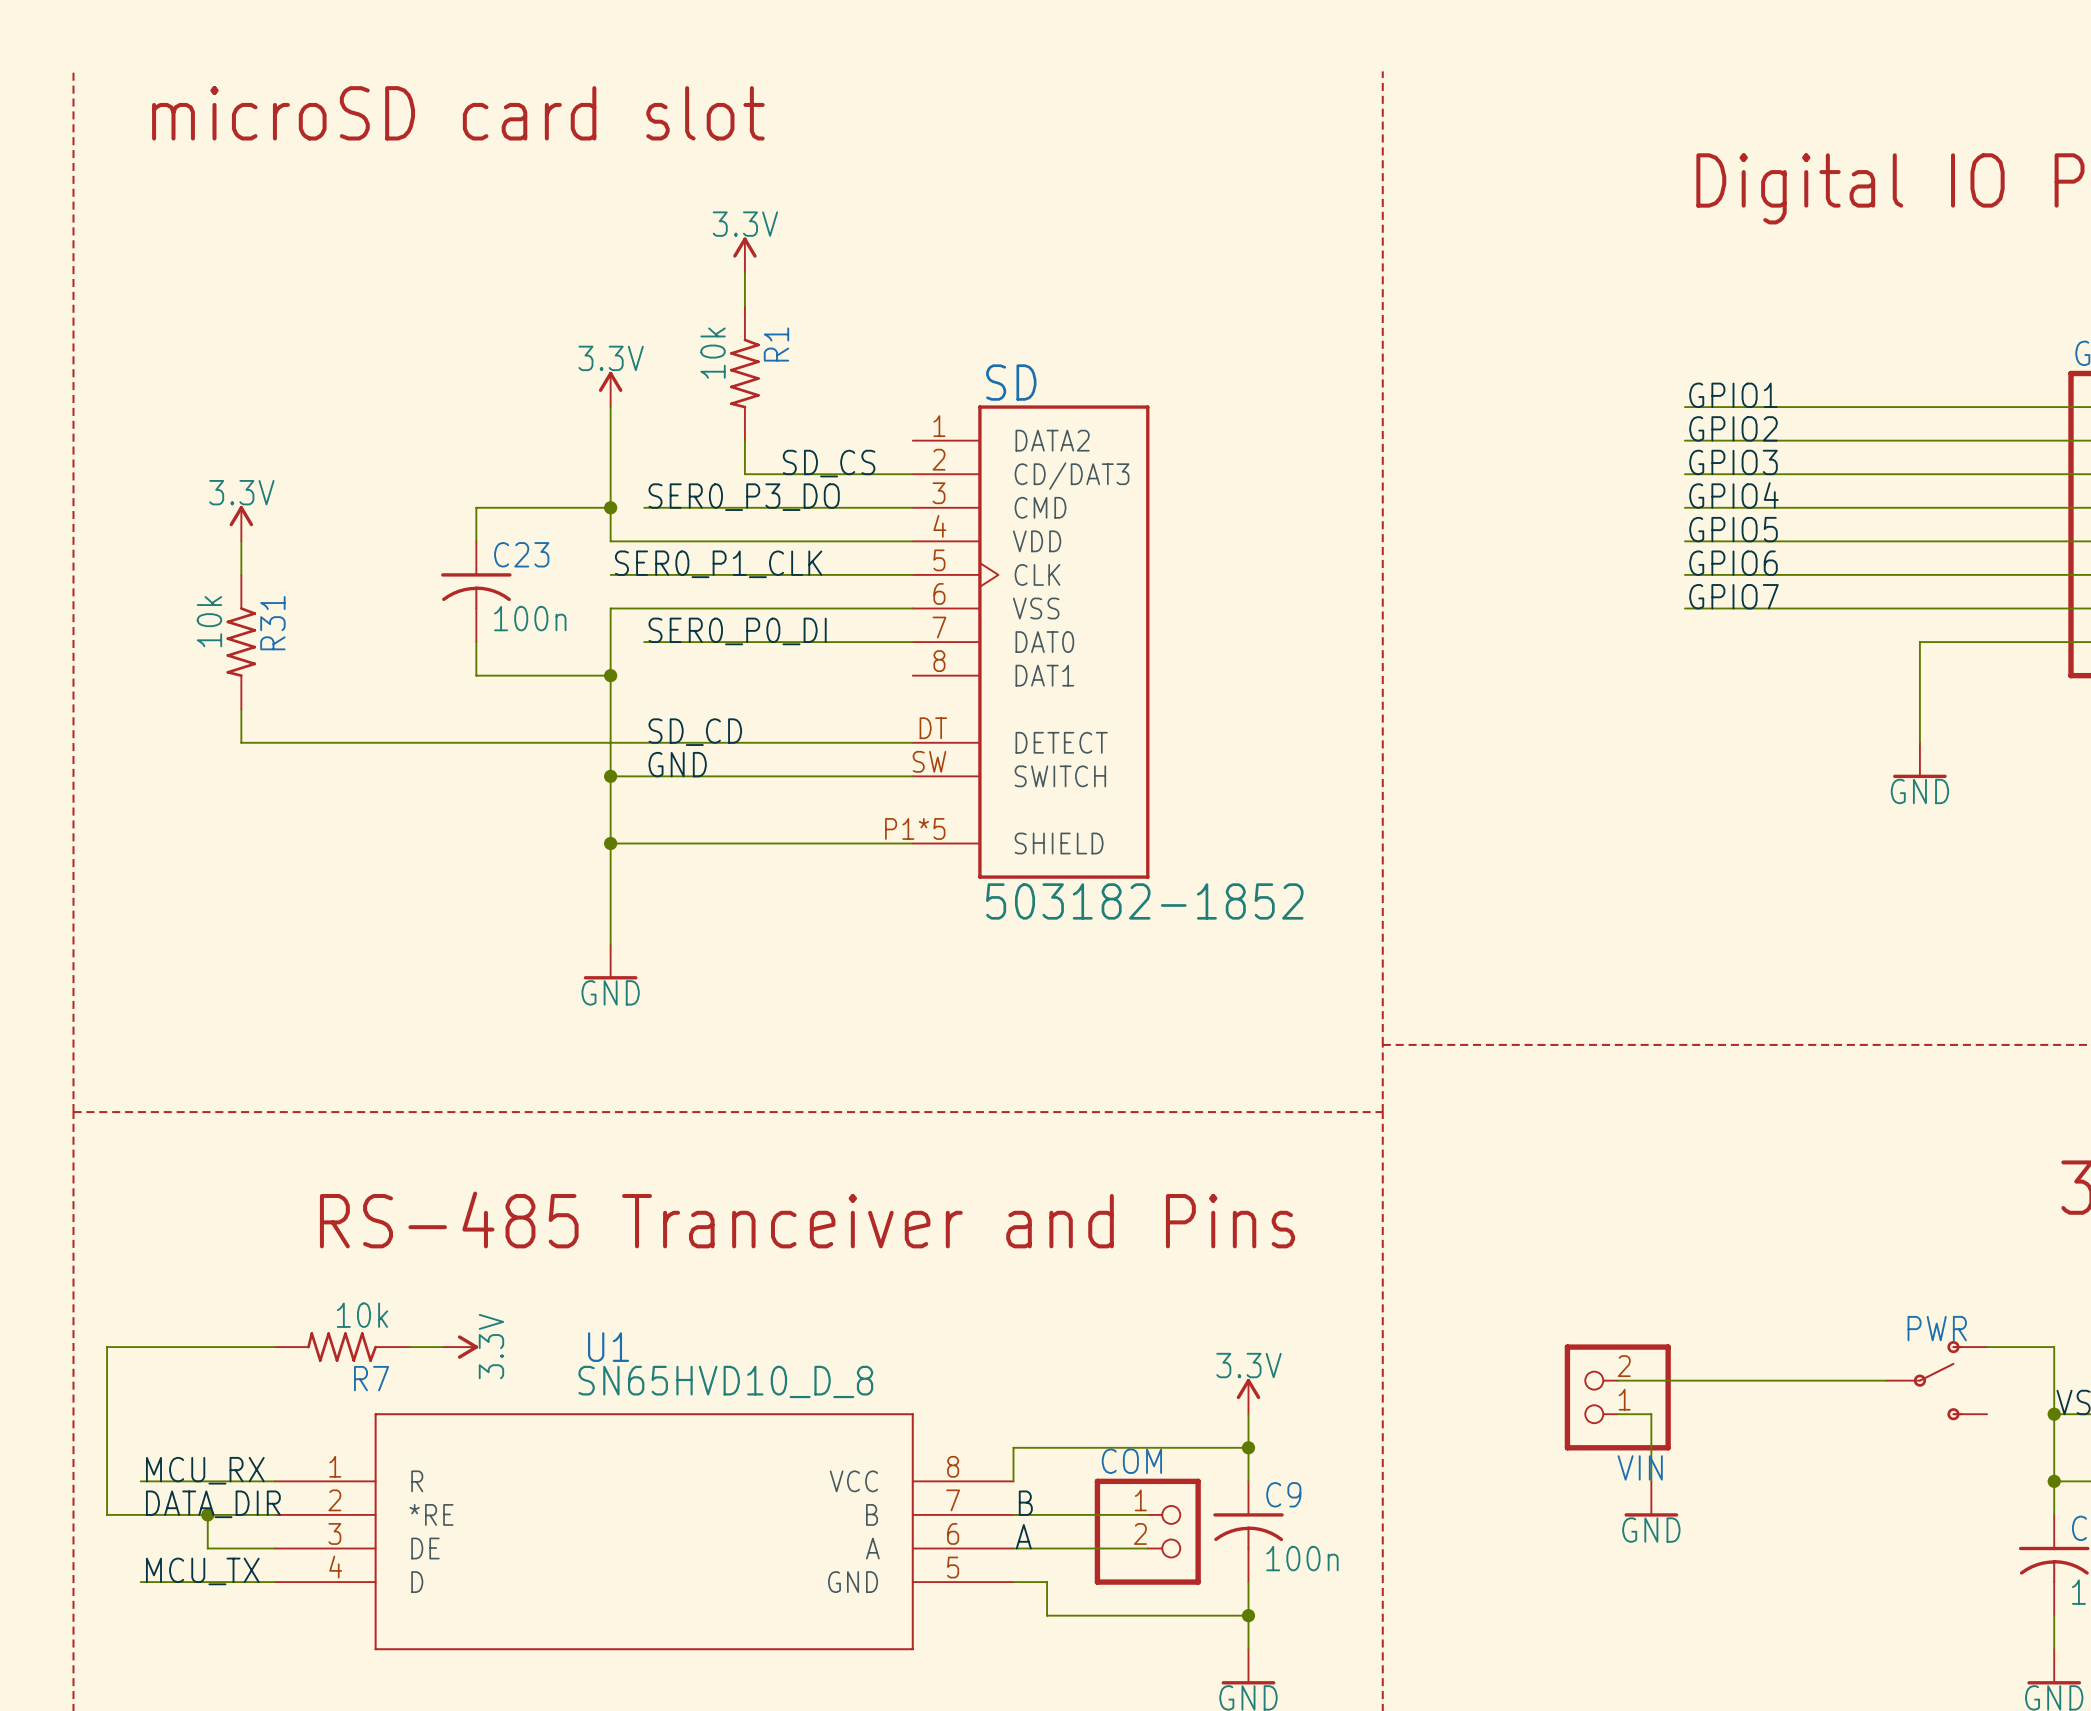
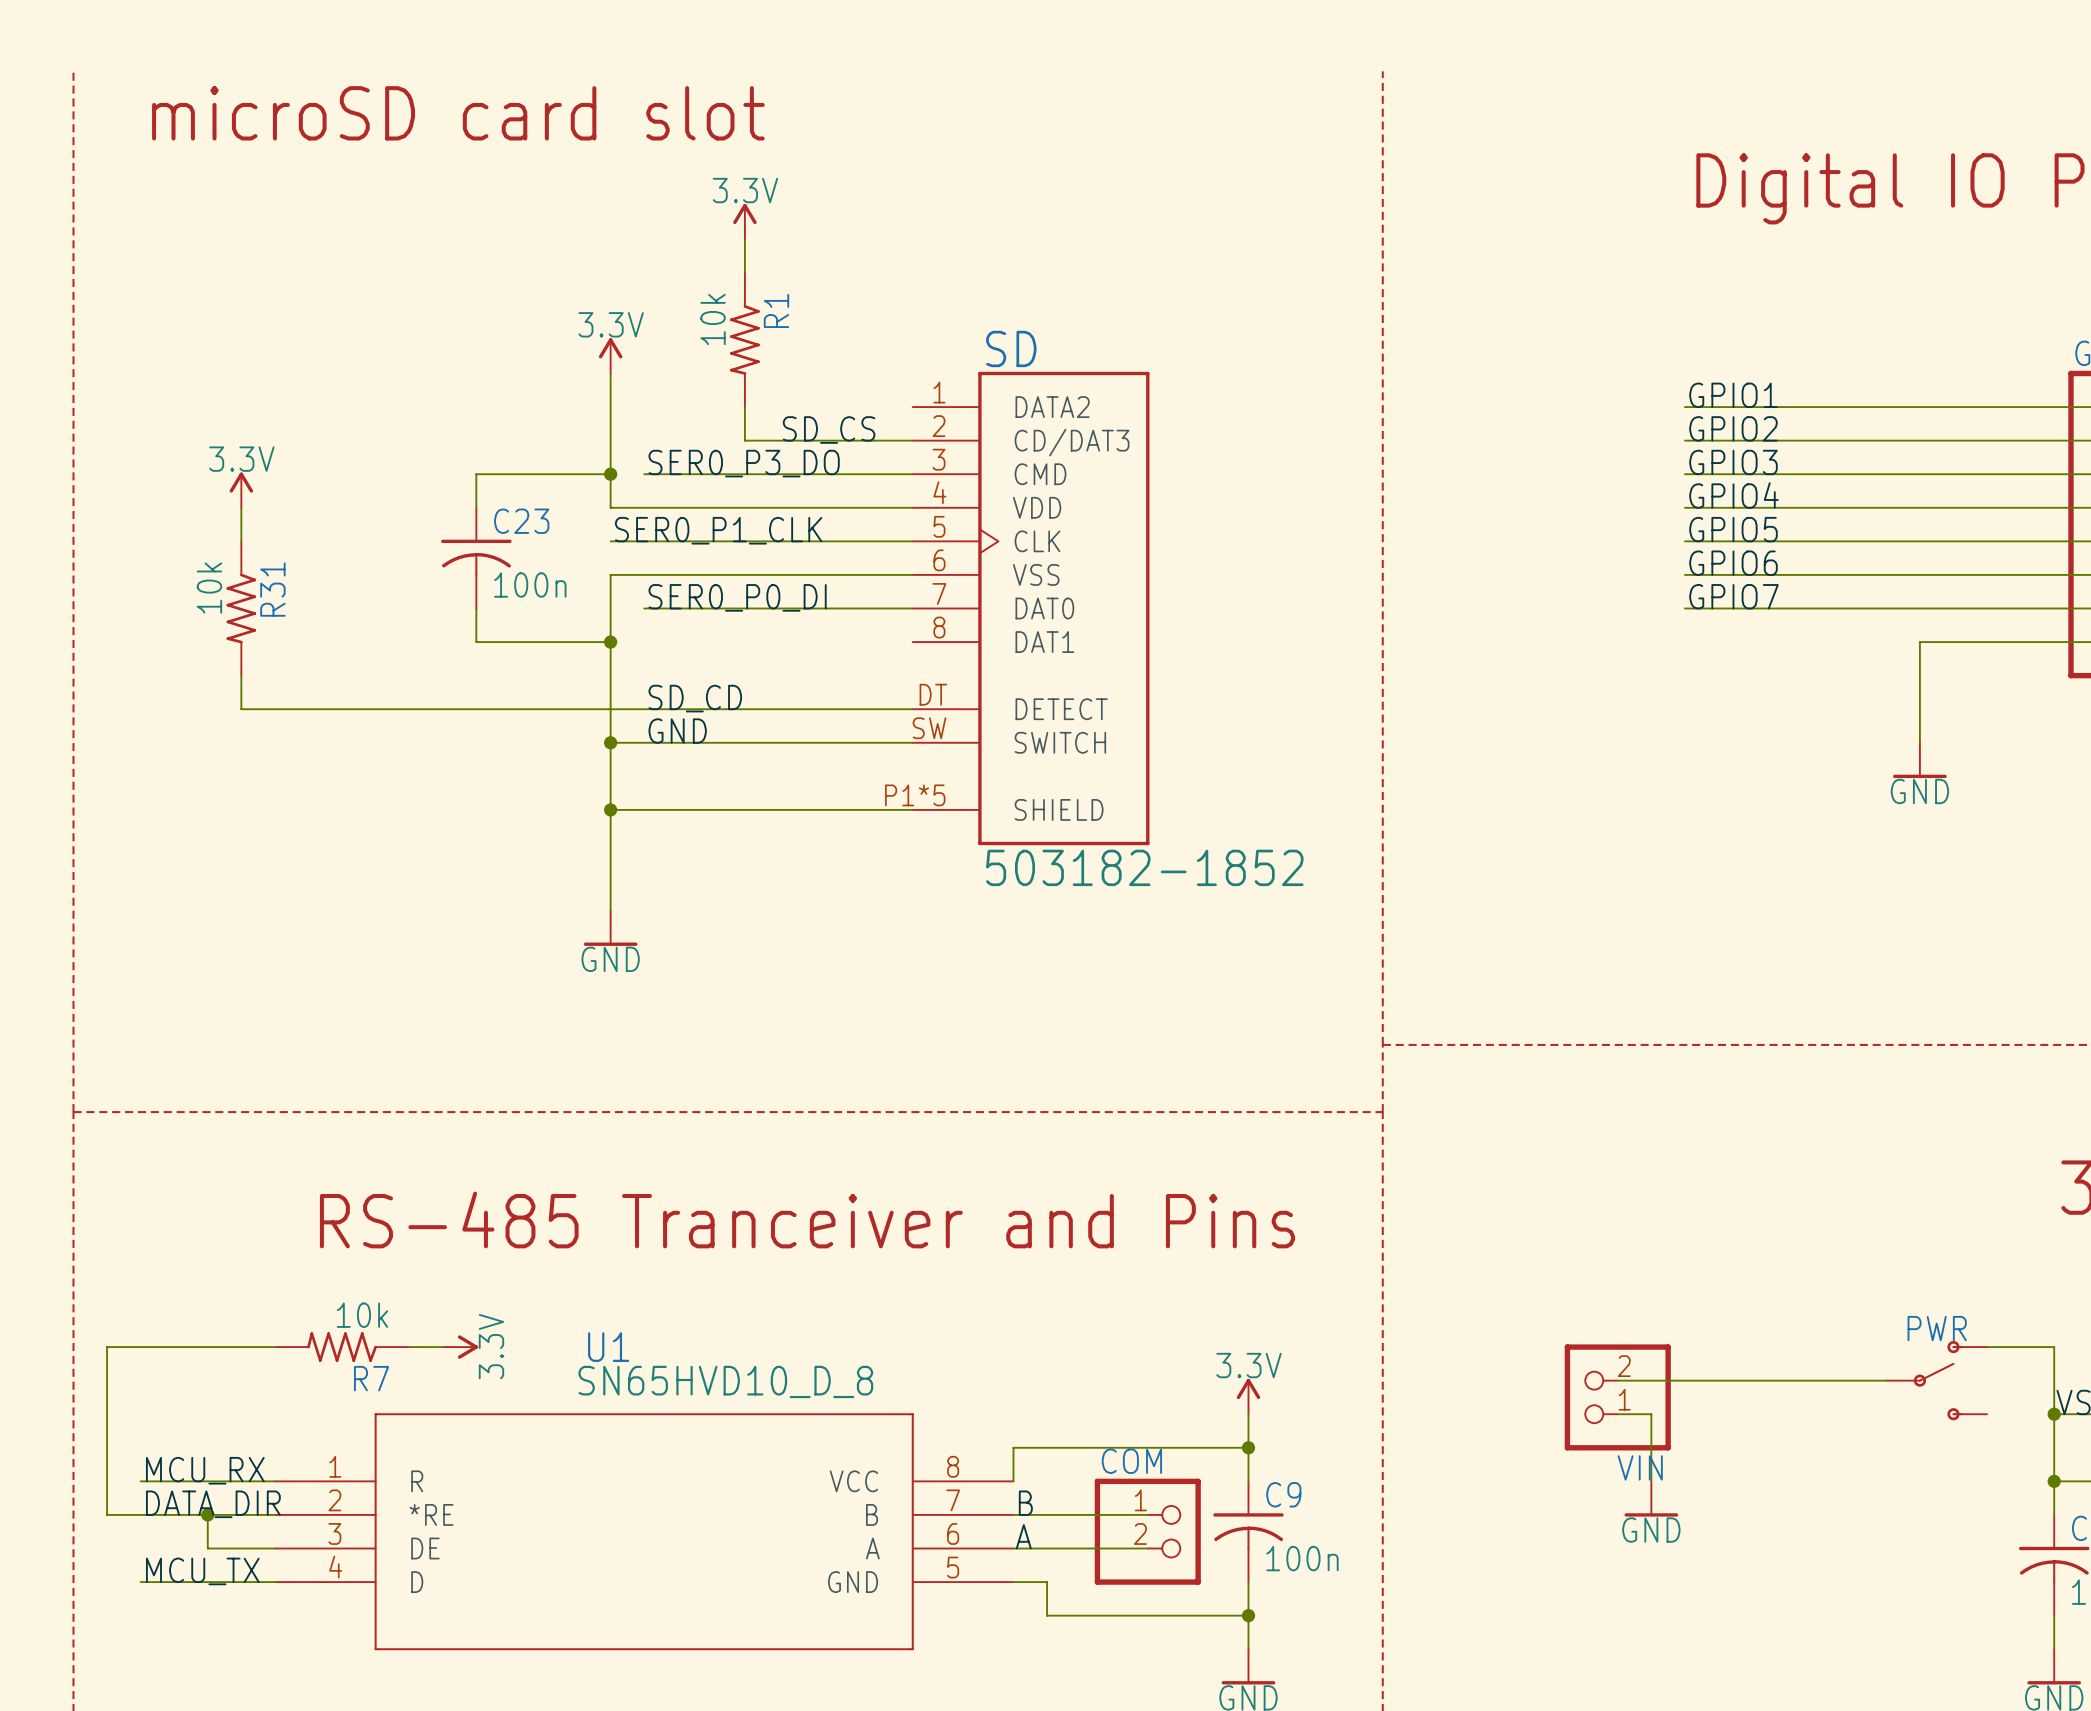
power symbol position: 3.3V (744, 255) -> 3.3V (744, 221)
R1 position: (744, 373) -> (744, 339)
power symbol position: 3.3V (610, 389) -> 3.3V (610, 355)
wire: none -> (744, 407) (744, 440) (912, 440)
wire: (744, 440) (744, 474) -> (644, 474) (744, 474)
label position: SD_CS (829, 463) -> SD_CS (829, 430)
wire: none -> (610, 474) (476, 474) (476, 507)
label position: SER0_P3_DO (744, 497) -> SER0_P3_DO (744, 463)
wire: none -> (610, 507) (644, 507)
junction position: (610, 507) -> (610, 474)
power symbol position: 3.3V (241, 523) -> 3.3V (241, 490)
wire: (476, 541) (476, 507) (610, 507) (610, 541) -> none
label position: SER0_P1_CLK (718, 564) -> SER0_P1_CLK (718, 530)
C23 position: (476, 591) -> (476, 558)
wire: (610, 608) (644, 608) -> (610, 608) (610, 574)
label position: SER0_P0_DI (737, 631) -> SER0_P0_DI (737, 597)
R31 position: (241, 642) -> (241, 608)
wire: (476, 642) (476, 675) (610, 675) -> (476, 608) (476, 642) (610, 642)
junction: none -> (610, 642)
wire: (644, 642) (912, 642) -> none
SD position: (1031, 642) -> (1031, 608)
wire: none -> (241, 675) (241, 709) (912, 709)
junction: (610, 675) -> none
label: none -> SD_CD (695, 698)
wire: (241, 709) (241, 742) (610, 742) -> none
label: SD_CD (695, 732) -> GND (677, 731)
junction: none -> (610, 742)
label: GND (677, 764) -> none
wire: (610, 776) (912, 776) -> none
junction: (610, 776) -> none
junction: none -> (610, 809)
wire: (610, 843) (912, 843) -> (610, 809) (912, 809)
junction: (610, 843) -> none
power symbol position: GND (610, 961) -> GND (610, 928)

